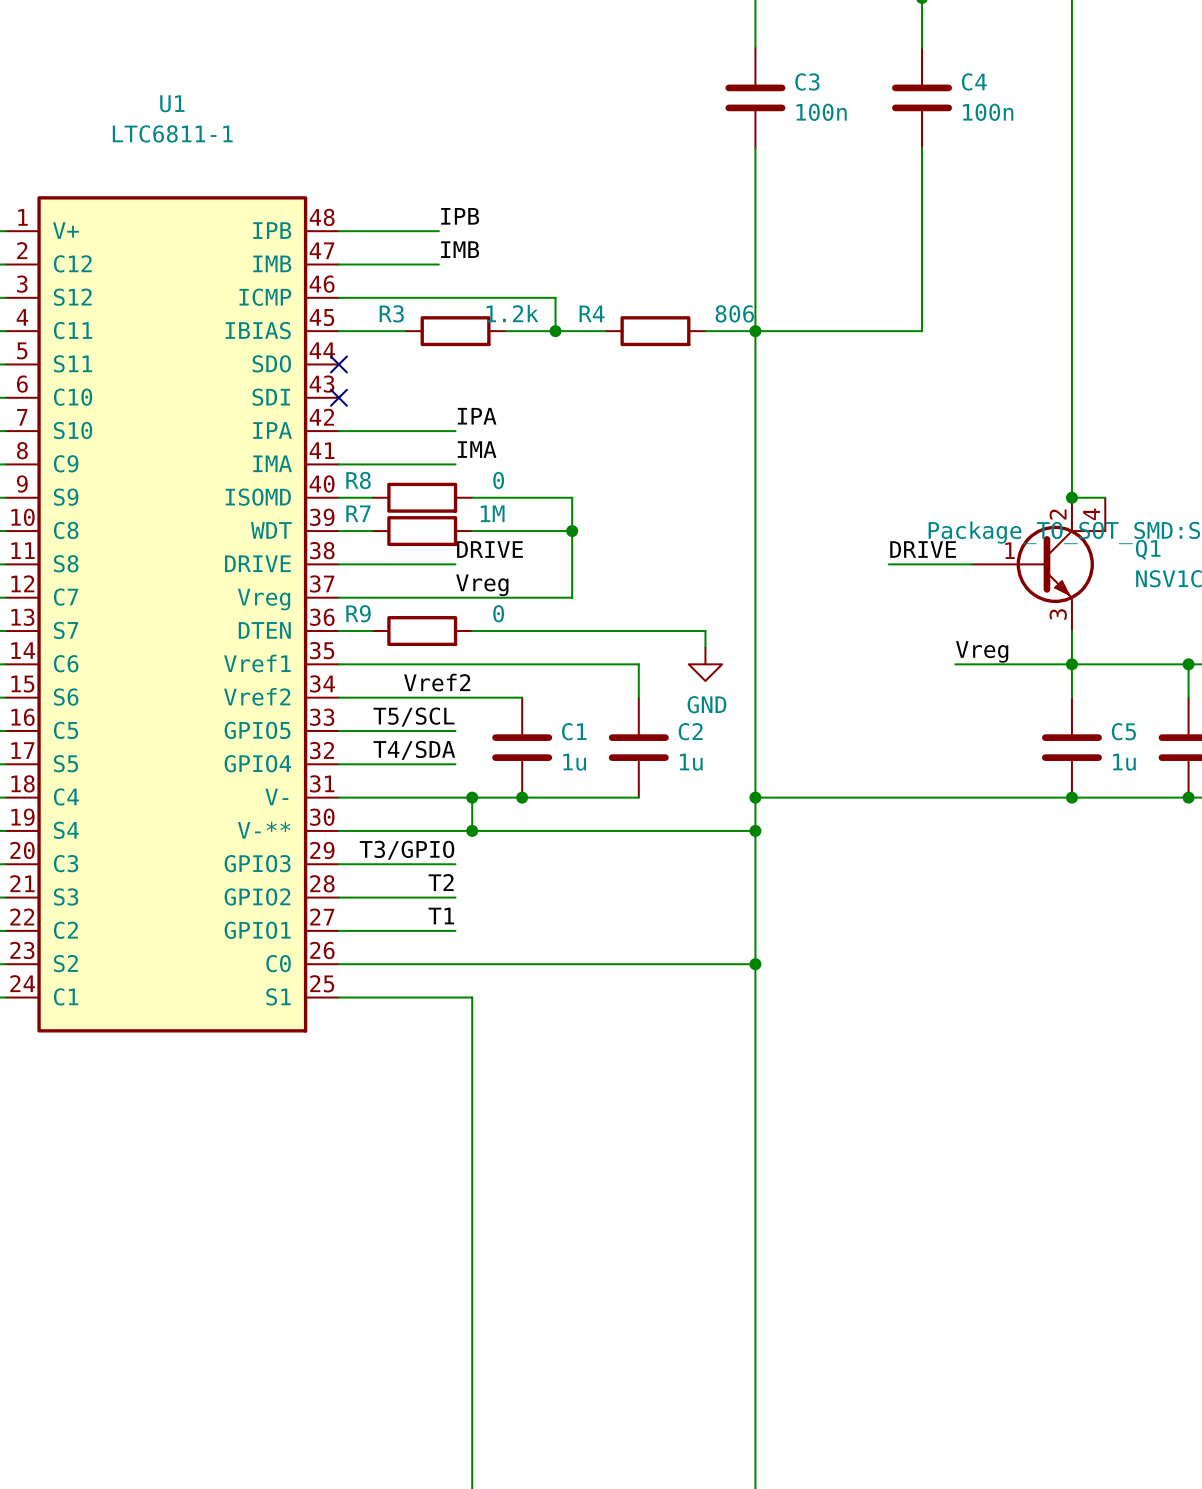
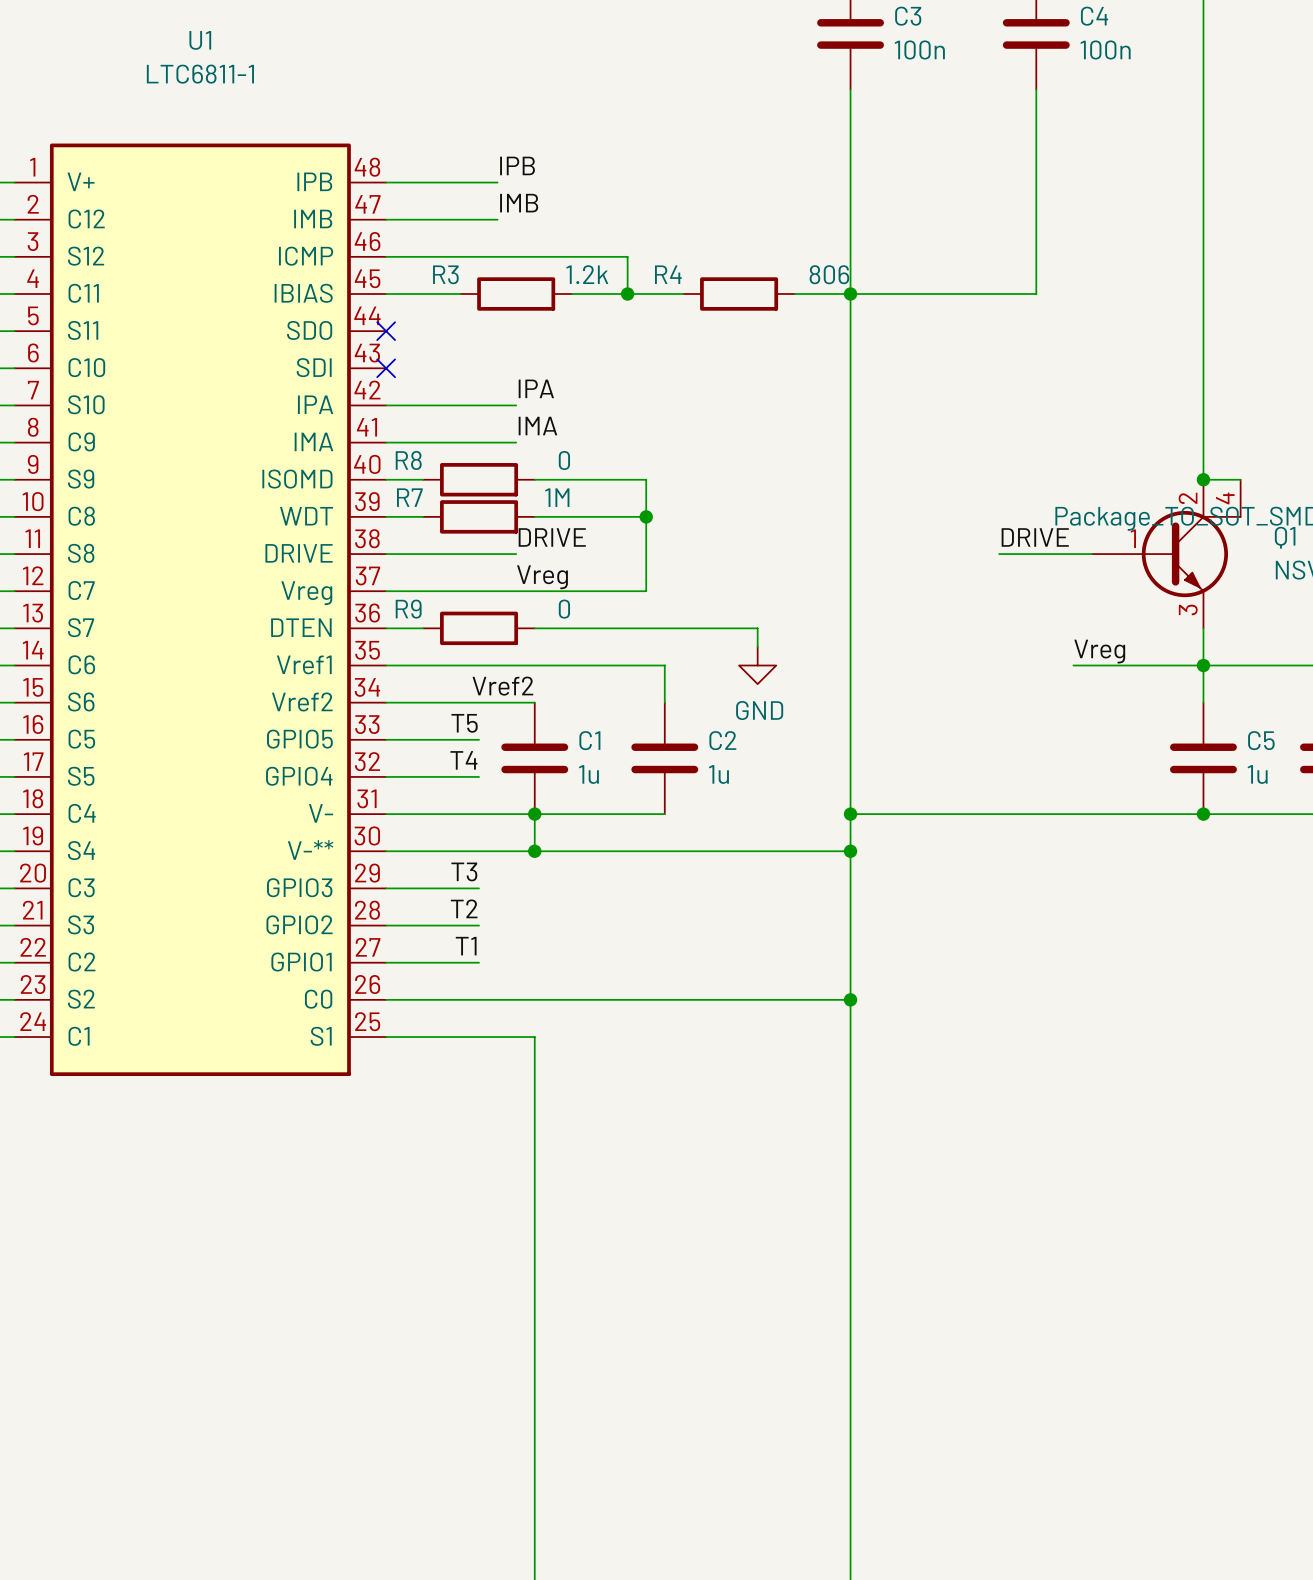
wire: (672, 631) (705, 631) (705, 647) -> (757, 628) (757, 646)
wire: (588, 664) (638, 664) (638, 697) -> (664, 665) (664, 702)
power symbol position: GND (705, 664) -> GND (757, 665)
wire: (472, 697) (522, 697) -> none
label: none -> T5 (464, 723)
label: T5/SCL (414, 717) -> none
wire: (422, 730) (455, 730) -> none
C1 position: (522, 747) -> (534, 758)
C2 position: (638, 747) -> (664, 758)
label: none -> T4 (463, 760)
label: T4/SDA (414, 750) -> none
wire: (422, 764) (455, 764) -> none
junction: (522, 797) -> none
wire: (588, 797) (638, 797) -> none
label: none -> T3 (464, 871)
label: T3/GPIO (407, 850) -> none
wire: (422, 864) (455, 864) -> none
label position: T2 (441, 882) -> T2 (464, 908)
wire: (422, 897) (455, 897) -> none
label position: T1 (441, 916) -> T1 (466, 946)
wire: (422, 930) (455, 930) -> none

